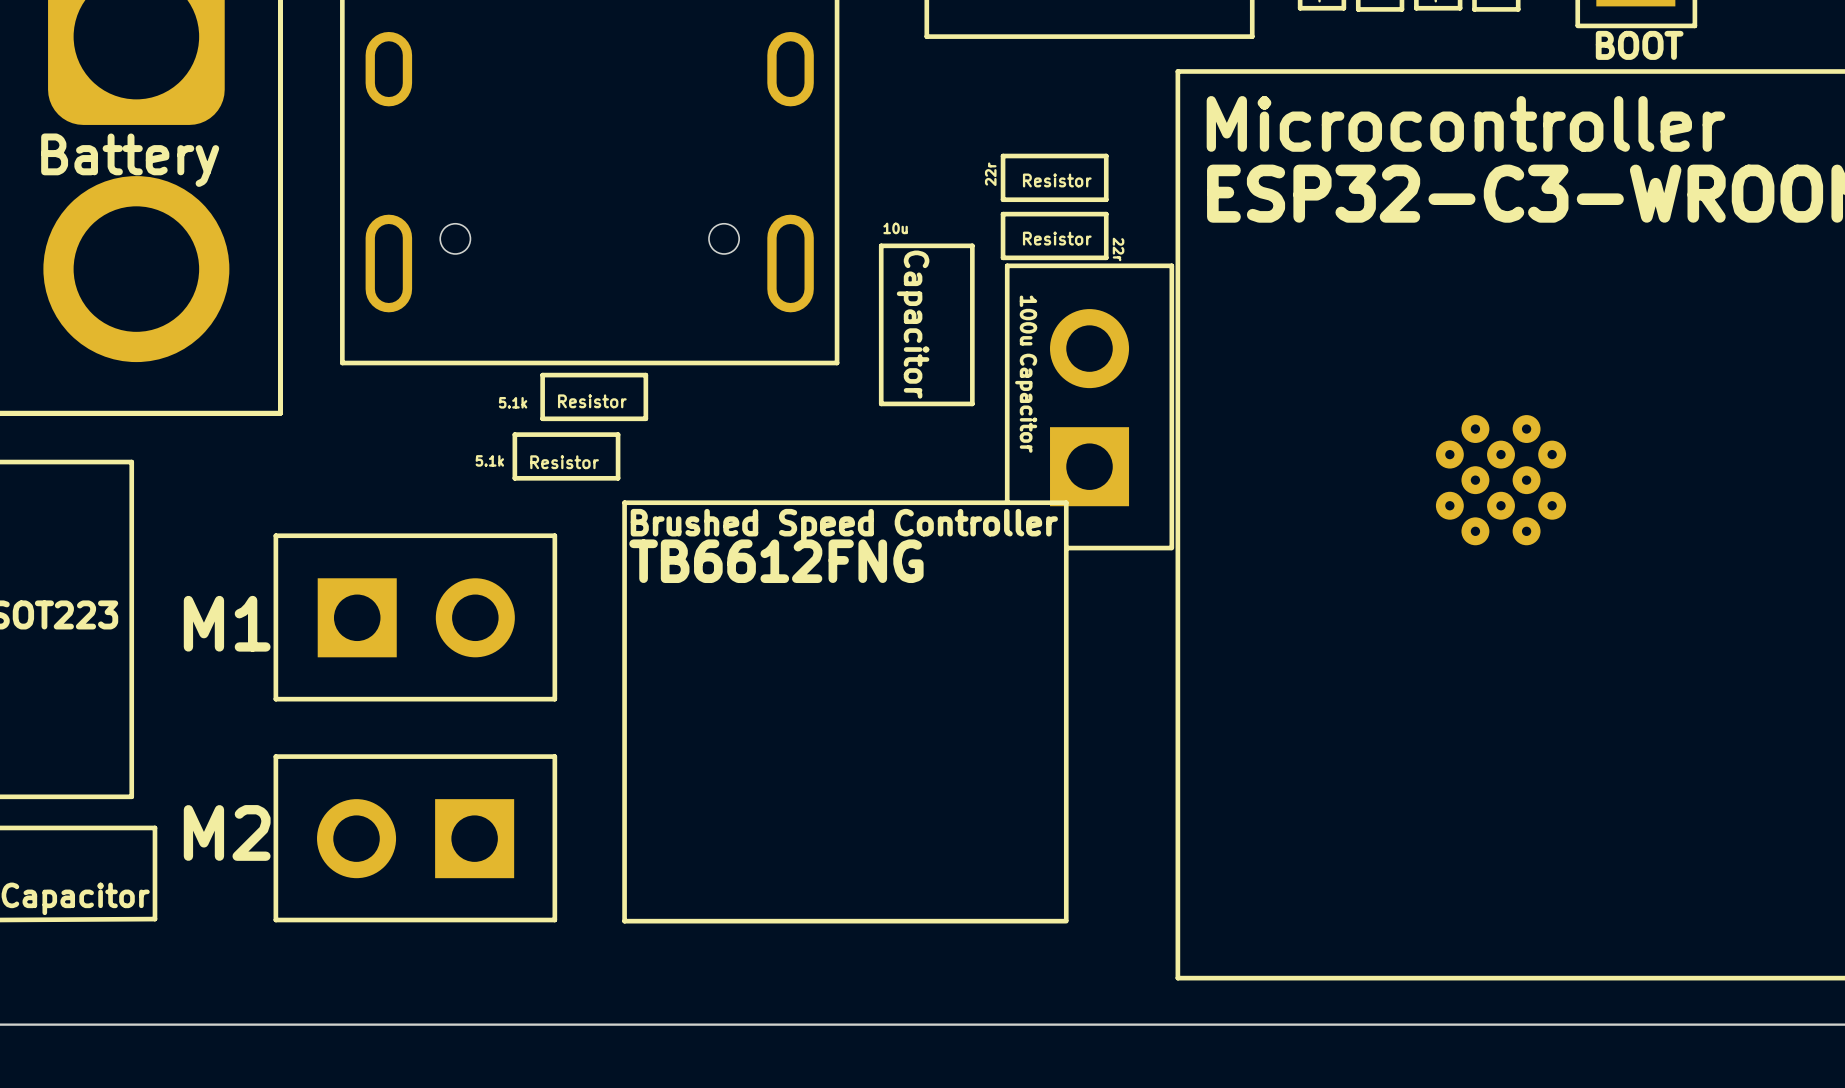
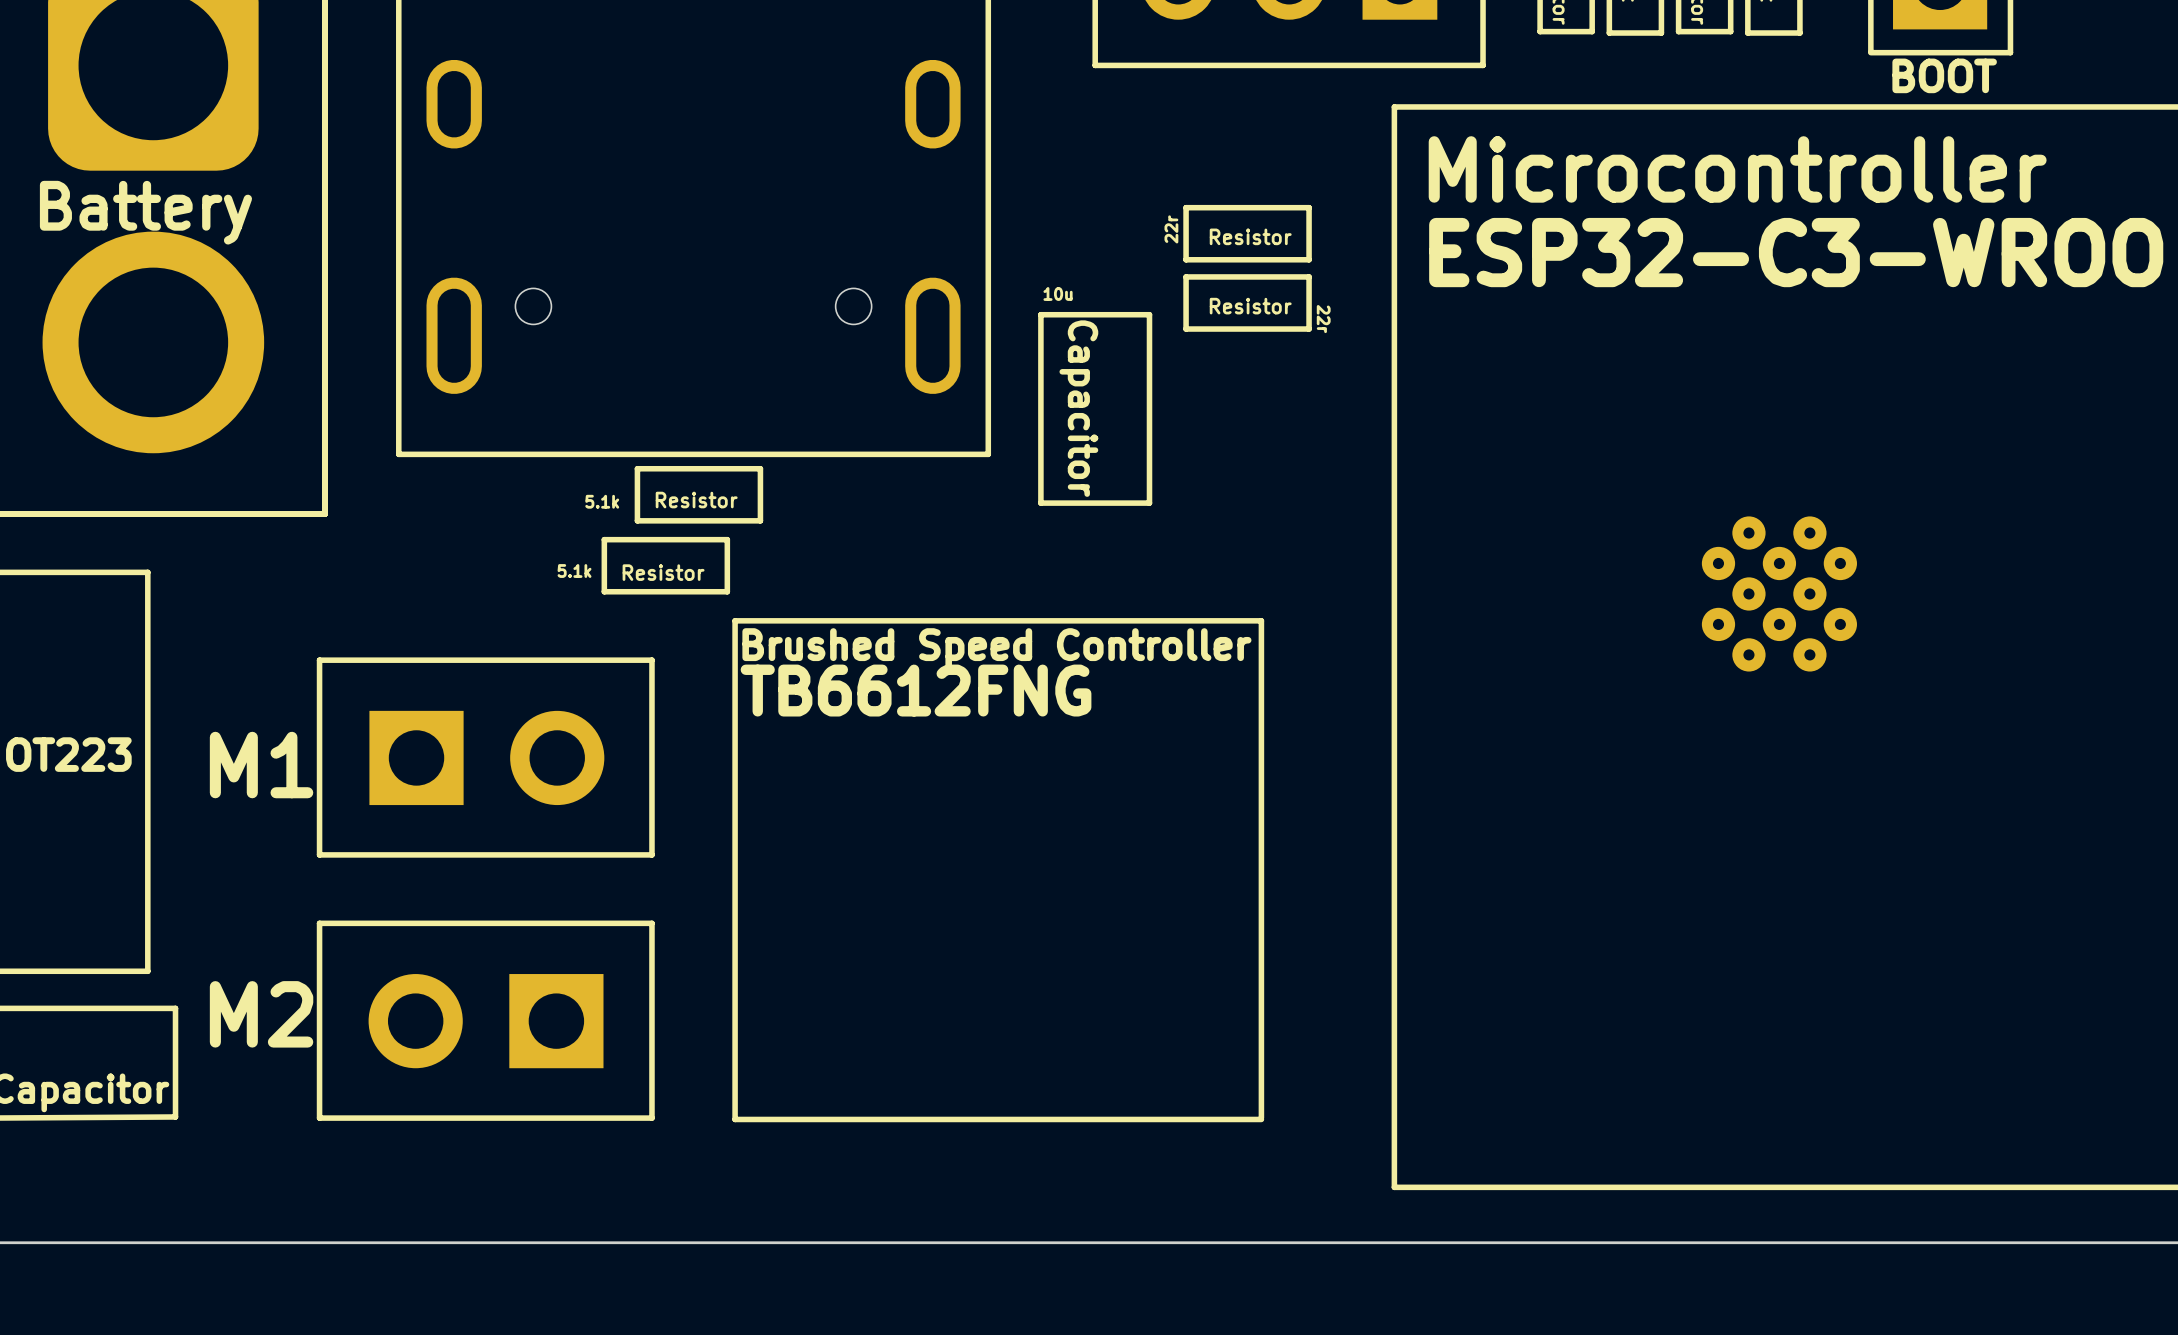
text: 100u (1028, 320) -> none
text: Capacitor (1026, 403) -> none
part: (1089, 407) -> none
line: (1007, 501) (1007, 265) (1171, 265) (1171, 548) -> none
line: (1170, 548) (1066, 548) -> none

